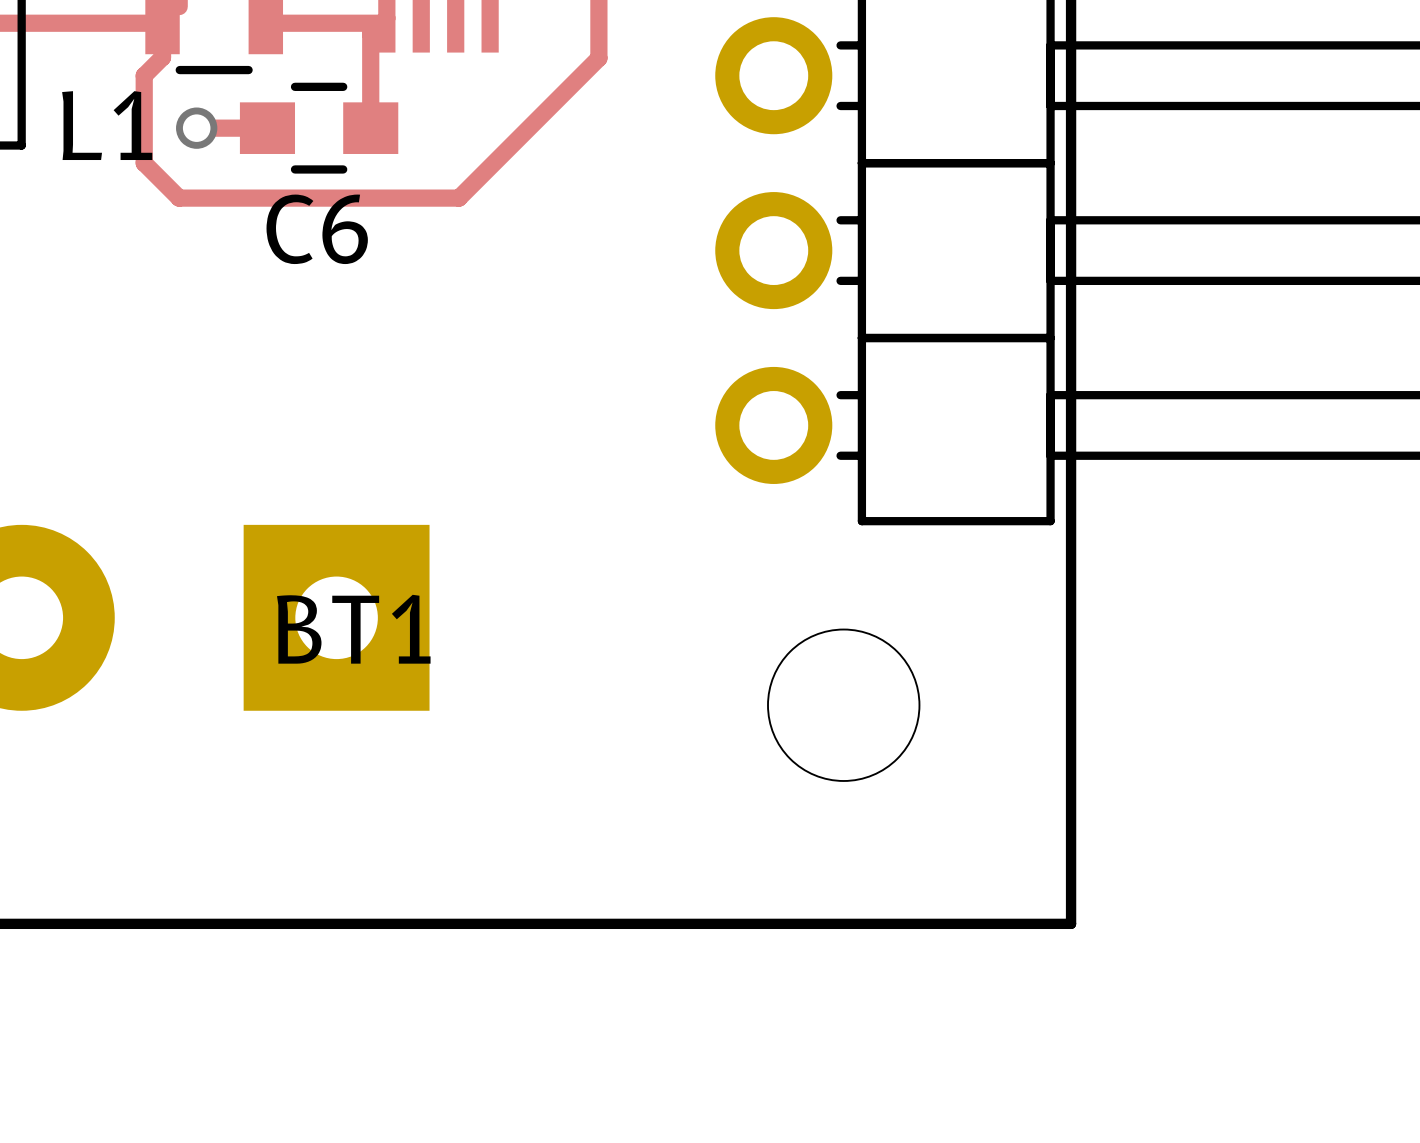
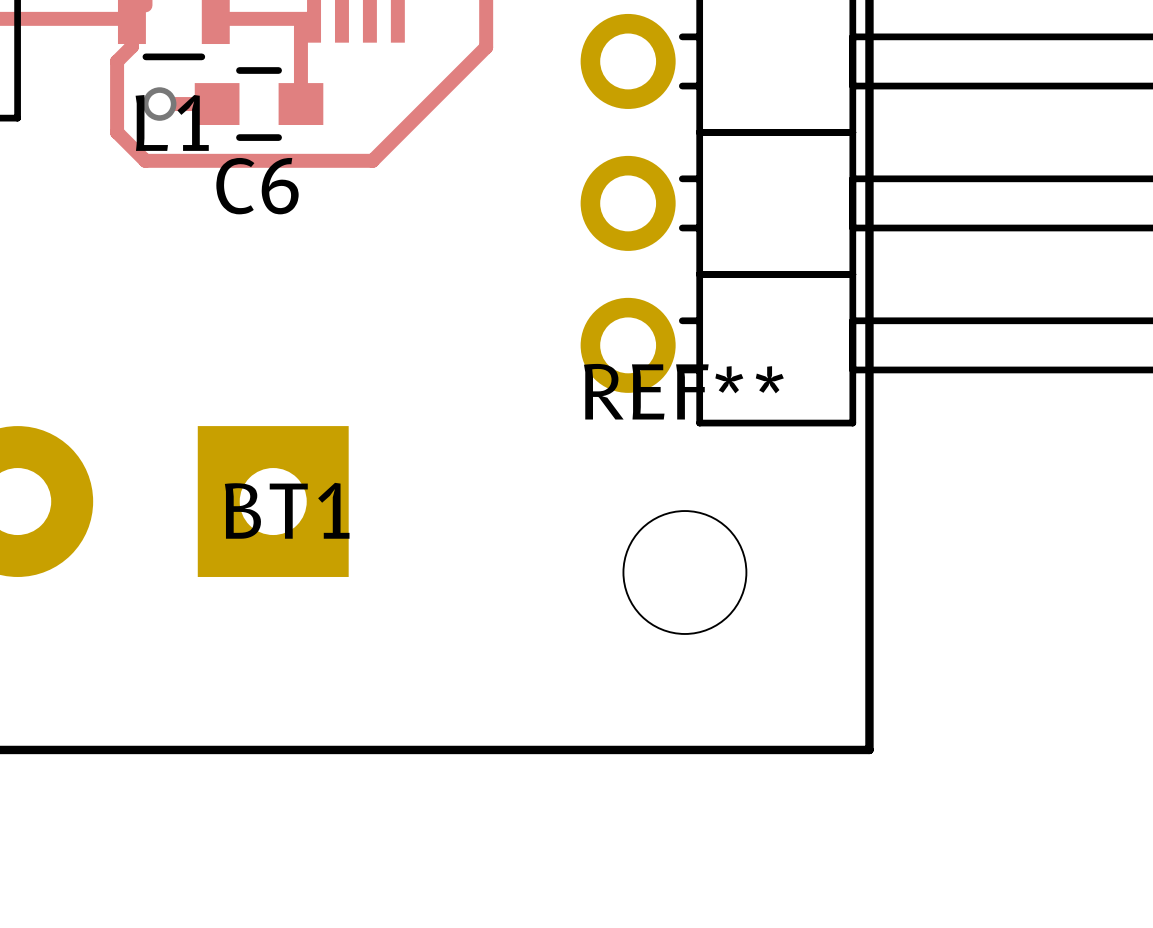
L1 name position: L1 (107, 125) -> L1 (172, 122)
REF** name: none -> REF** (683, 391)

